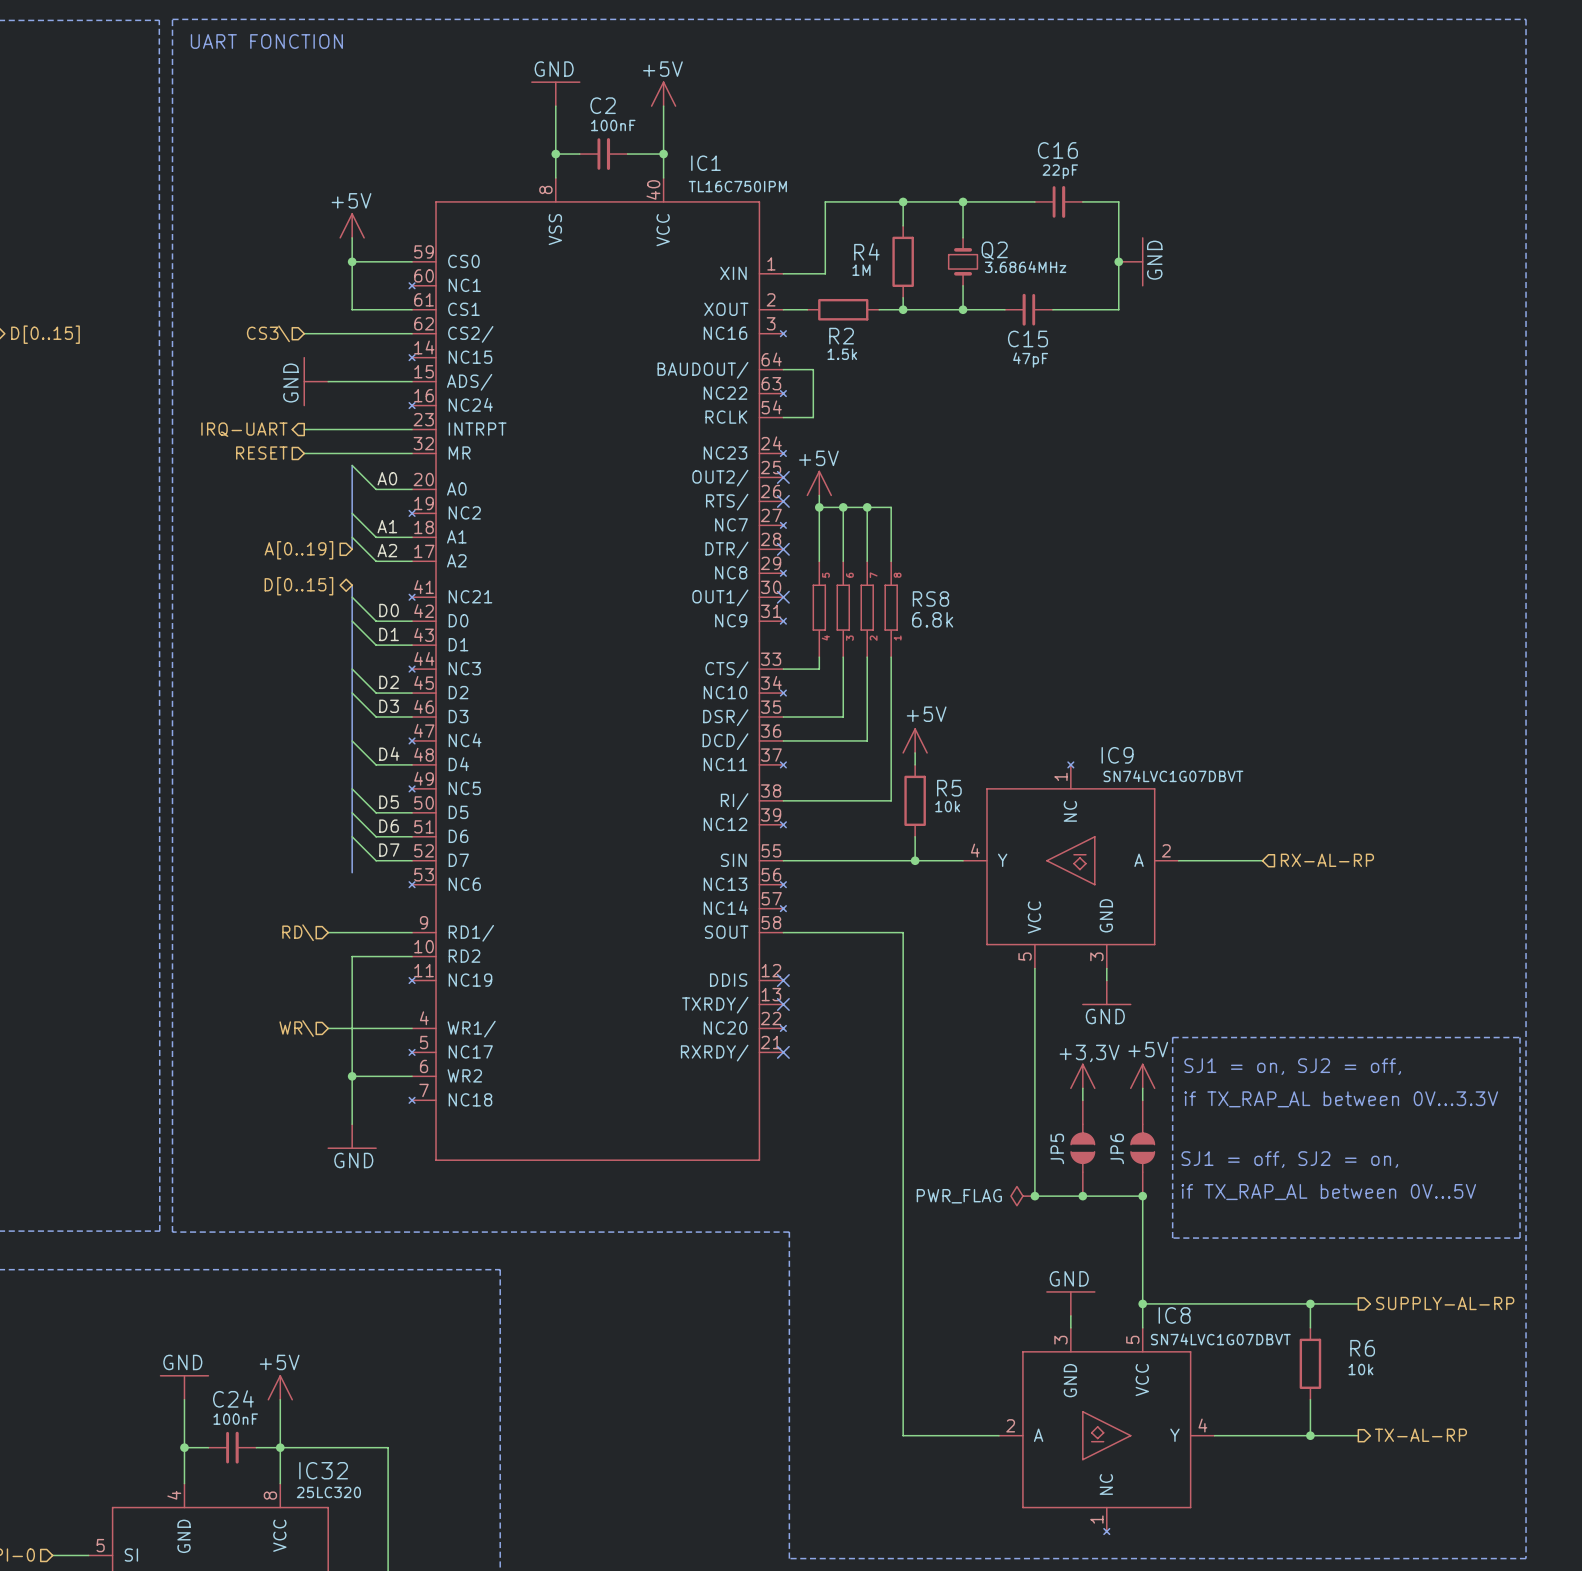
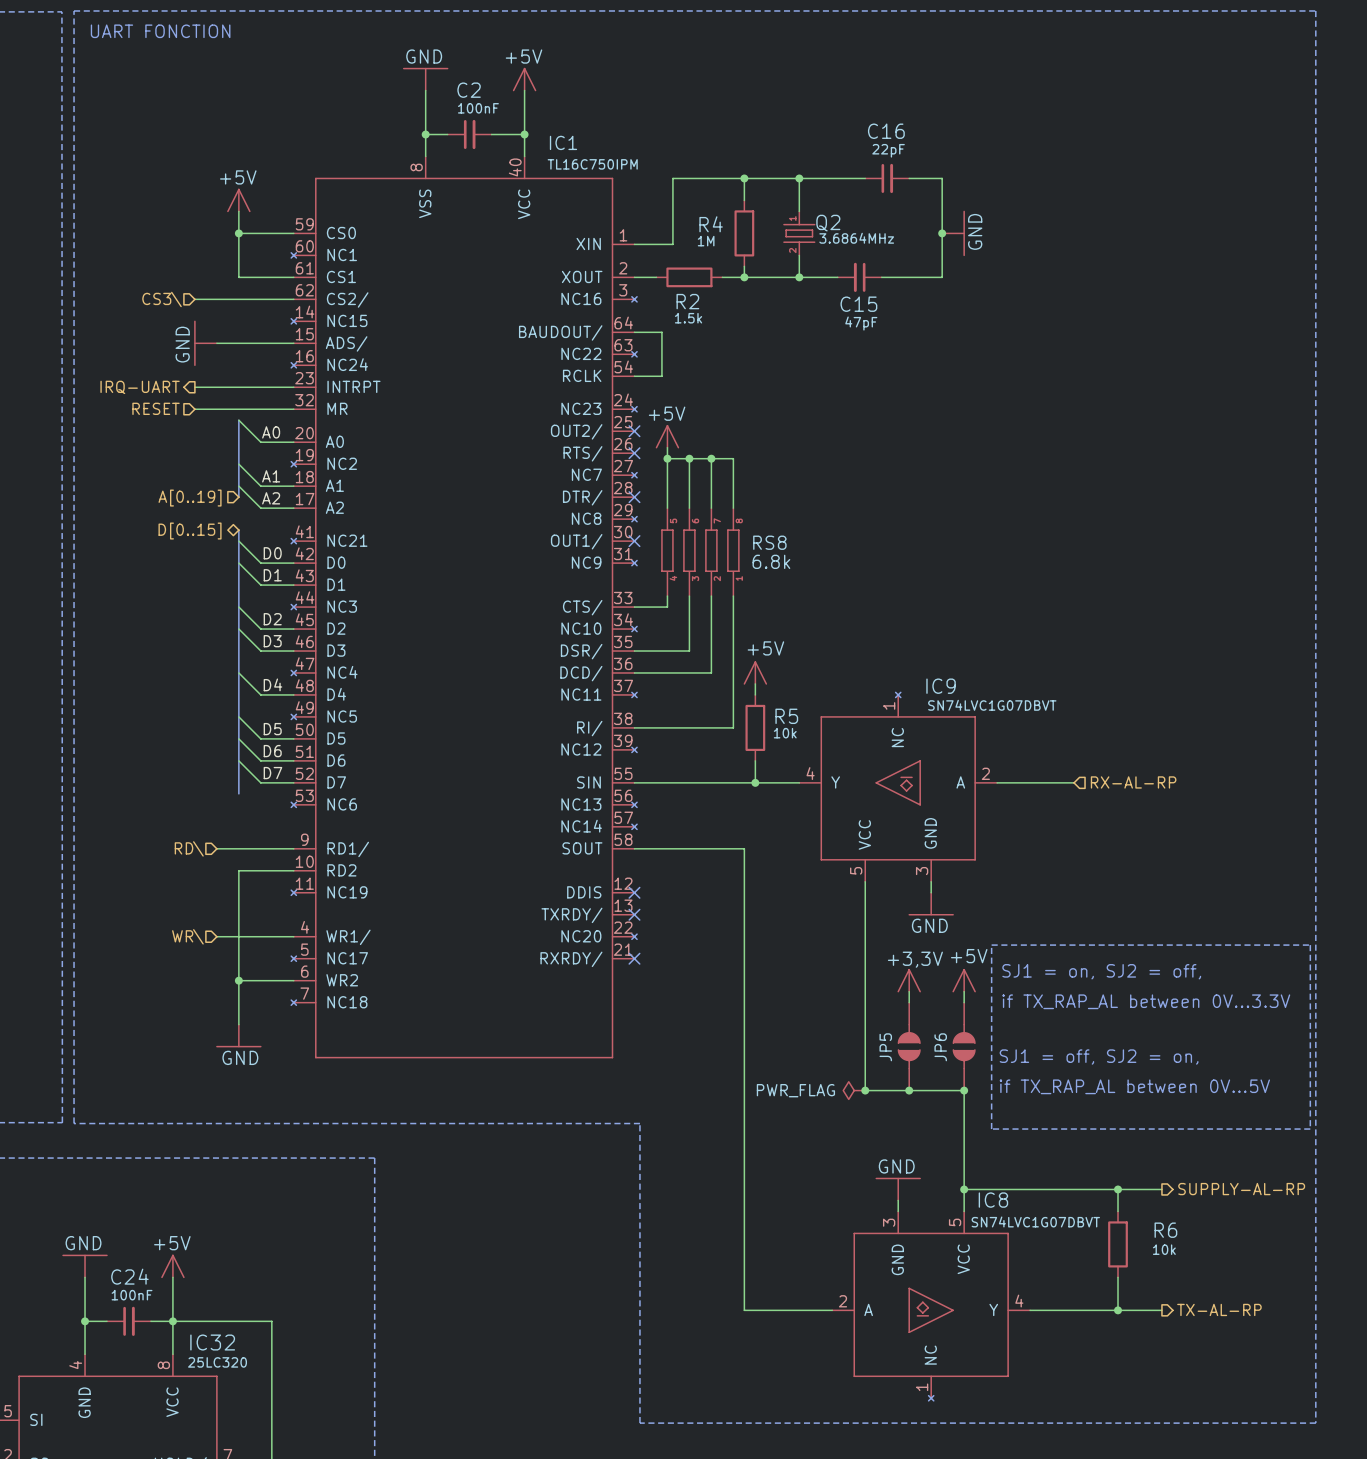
Q2 symbol: [948, 237, 978, 286] -> [783, 211, 815, 256]

